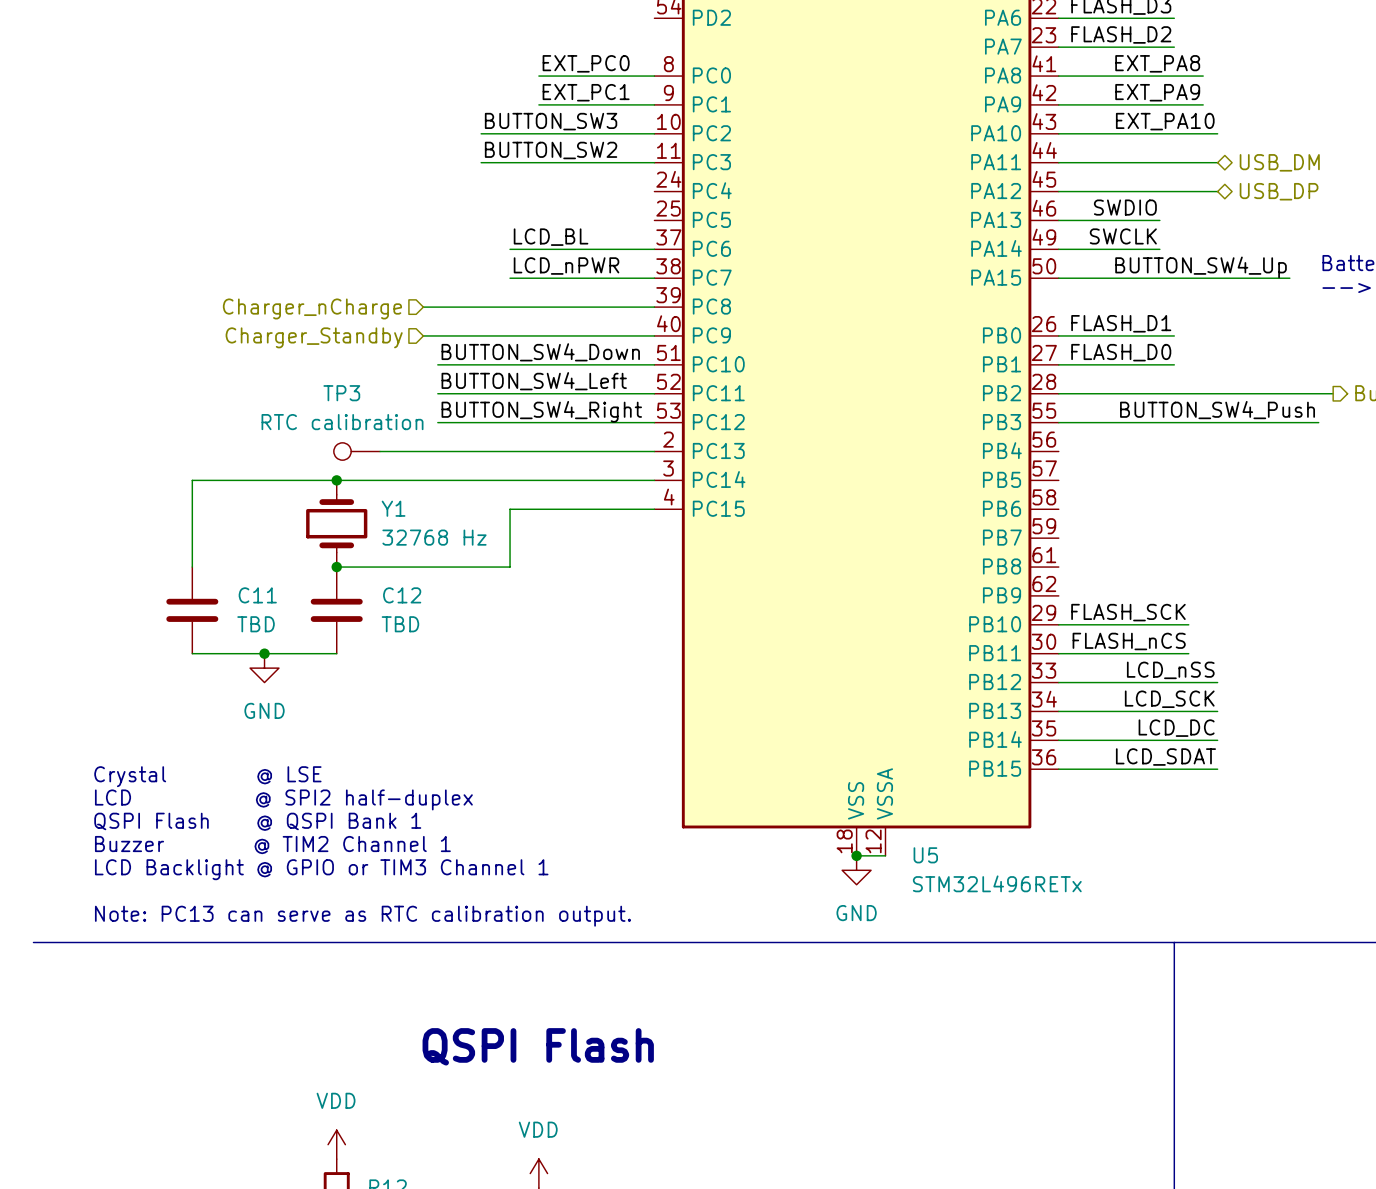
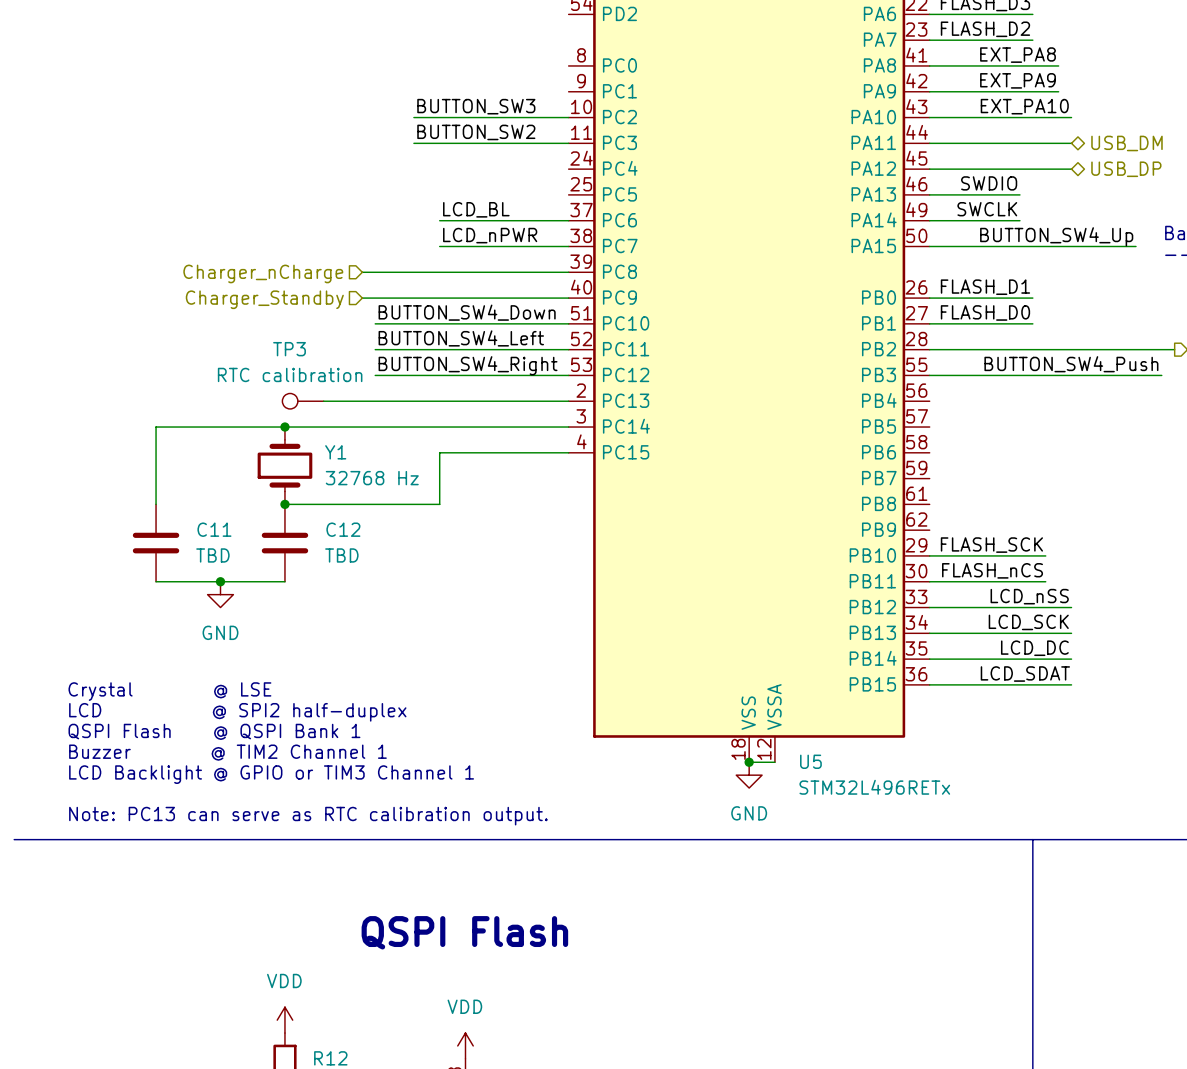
label: EXT_PC0 (586, 63) -> none
wire: (538, 76) (654, 76) -> none
label: EXT_PC1 (586, 92) -> none
wire: (538, 104) (654, 104) -> none

